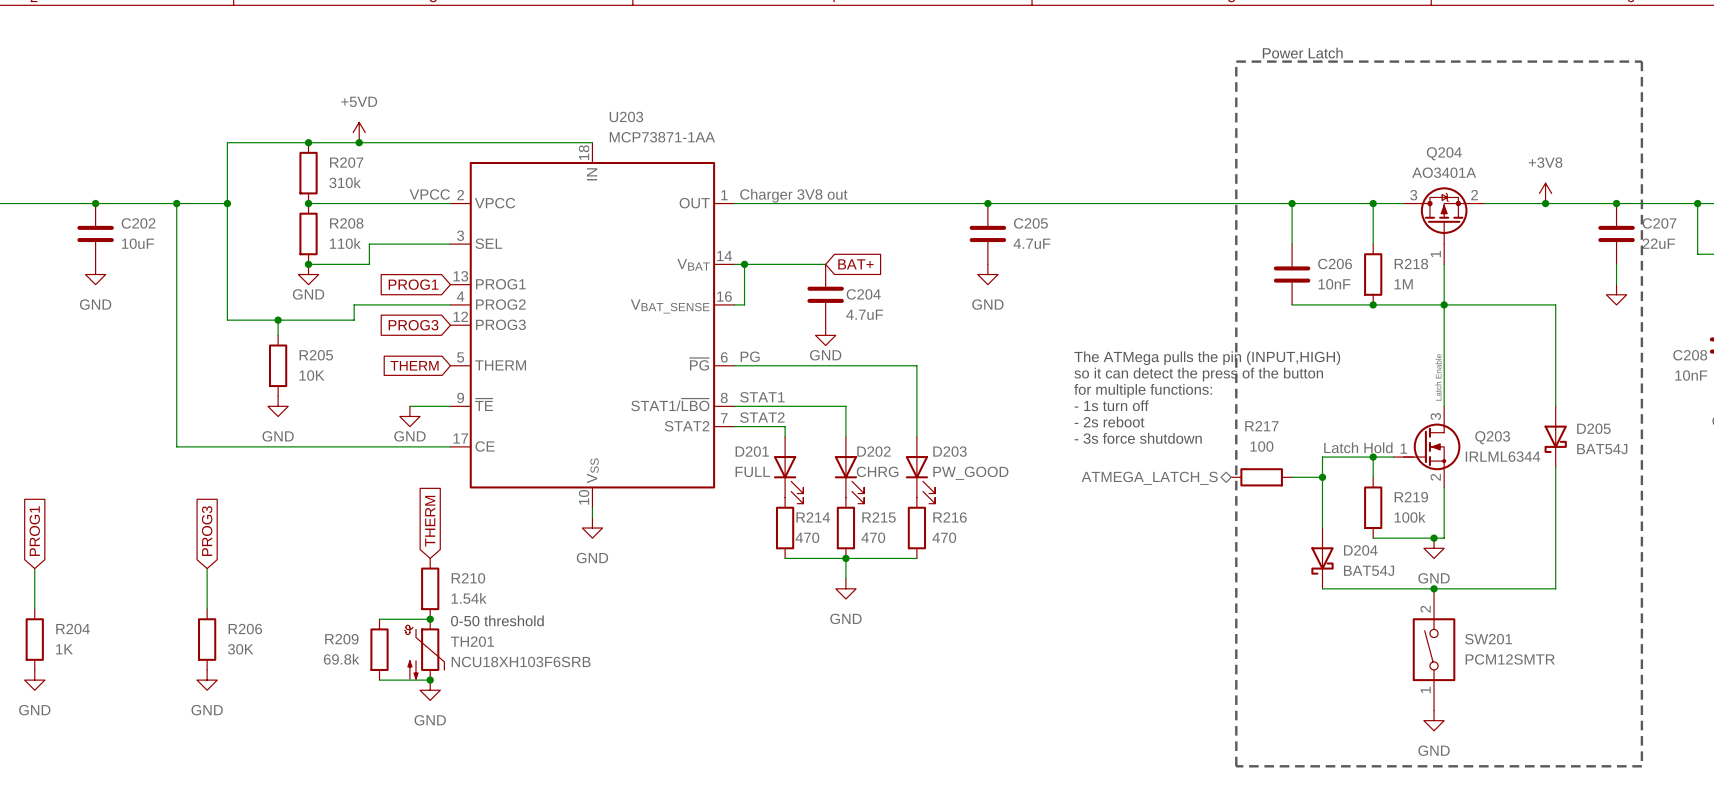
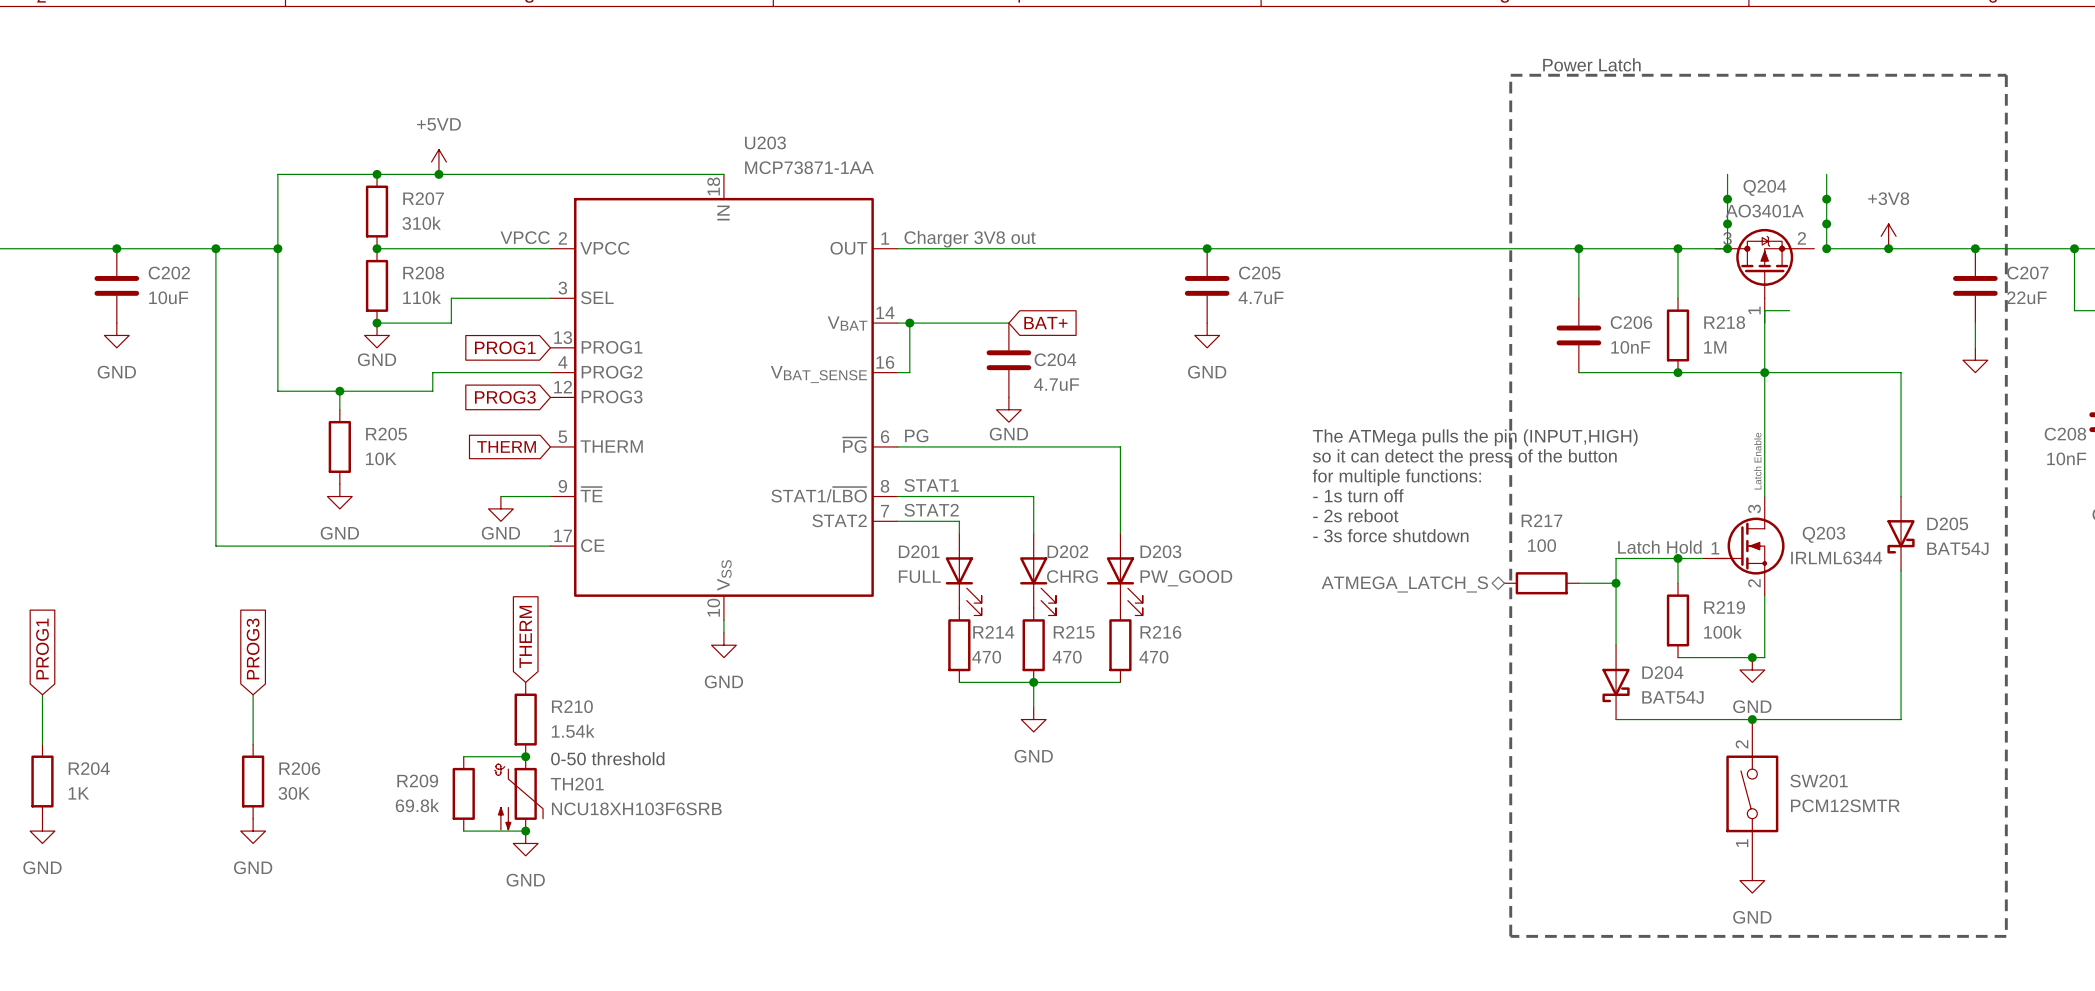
wire: none -> (1727, 174) (1727, 248) (1715, 248)
junction: none -> (1727, 199)
junction: none -> (1826, 199)
junction: none -> (1727, 223)
junction: none -> (1826, 223)
junction: none -> (1727, 248)
wire: (1484, 203) (1494, 203) -> (1826, 174) (1826, 248)
junction: none -> (1826, 248)
wire: none -> (1789, 310) (1764, 310) (1764, 323)

